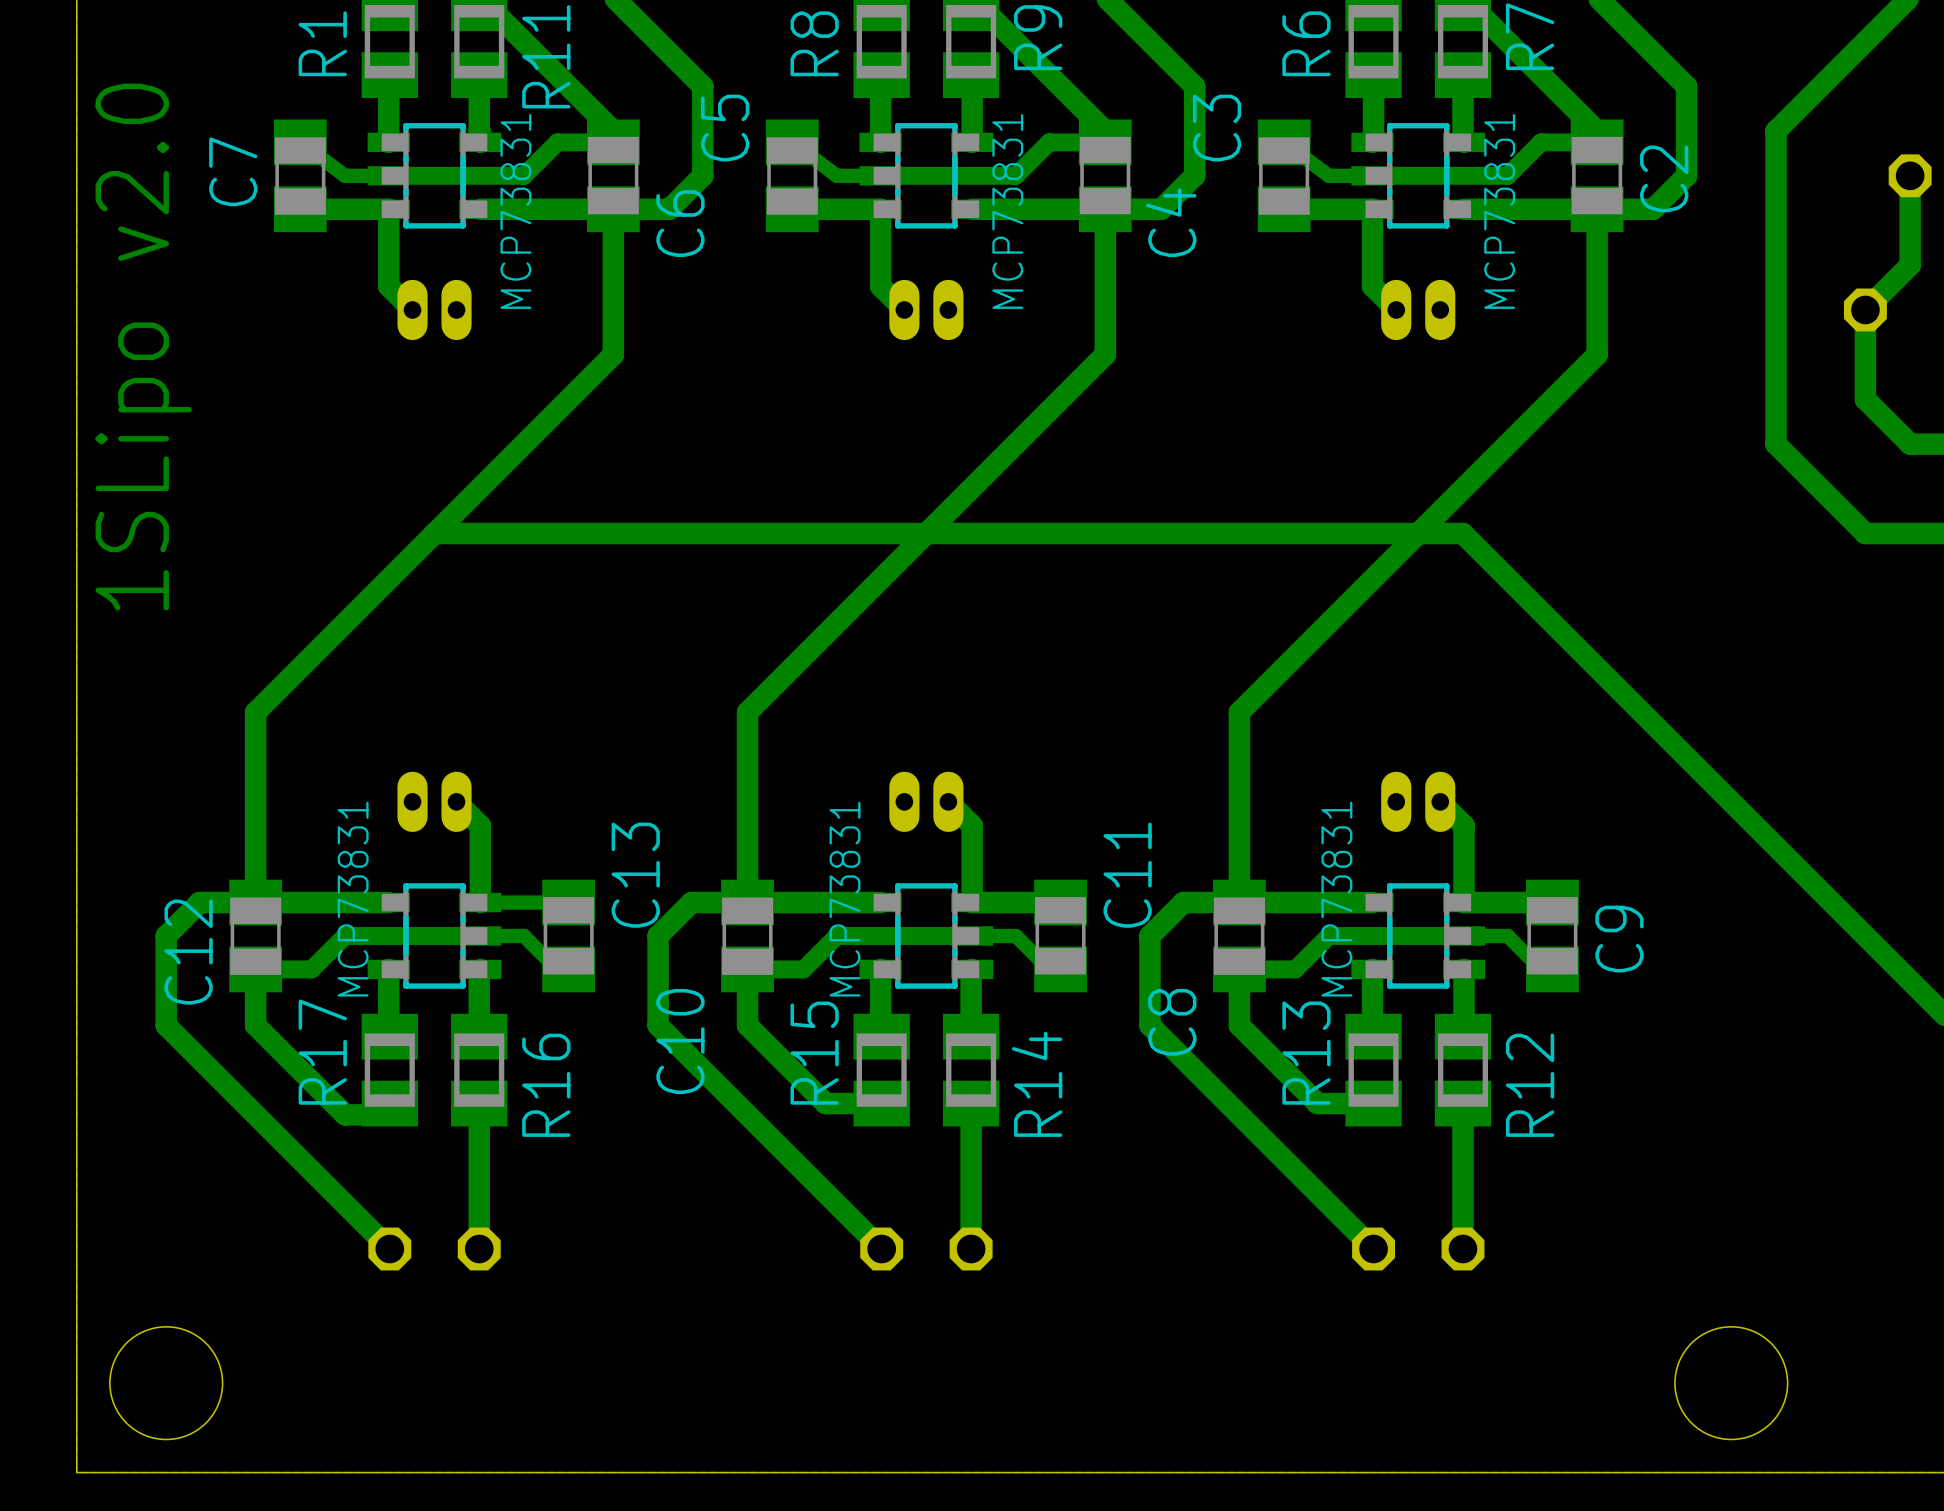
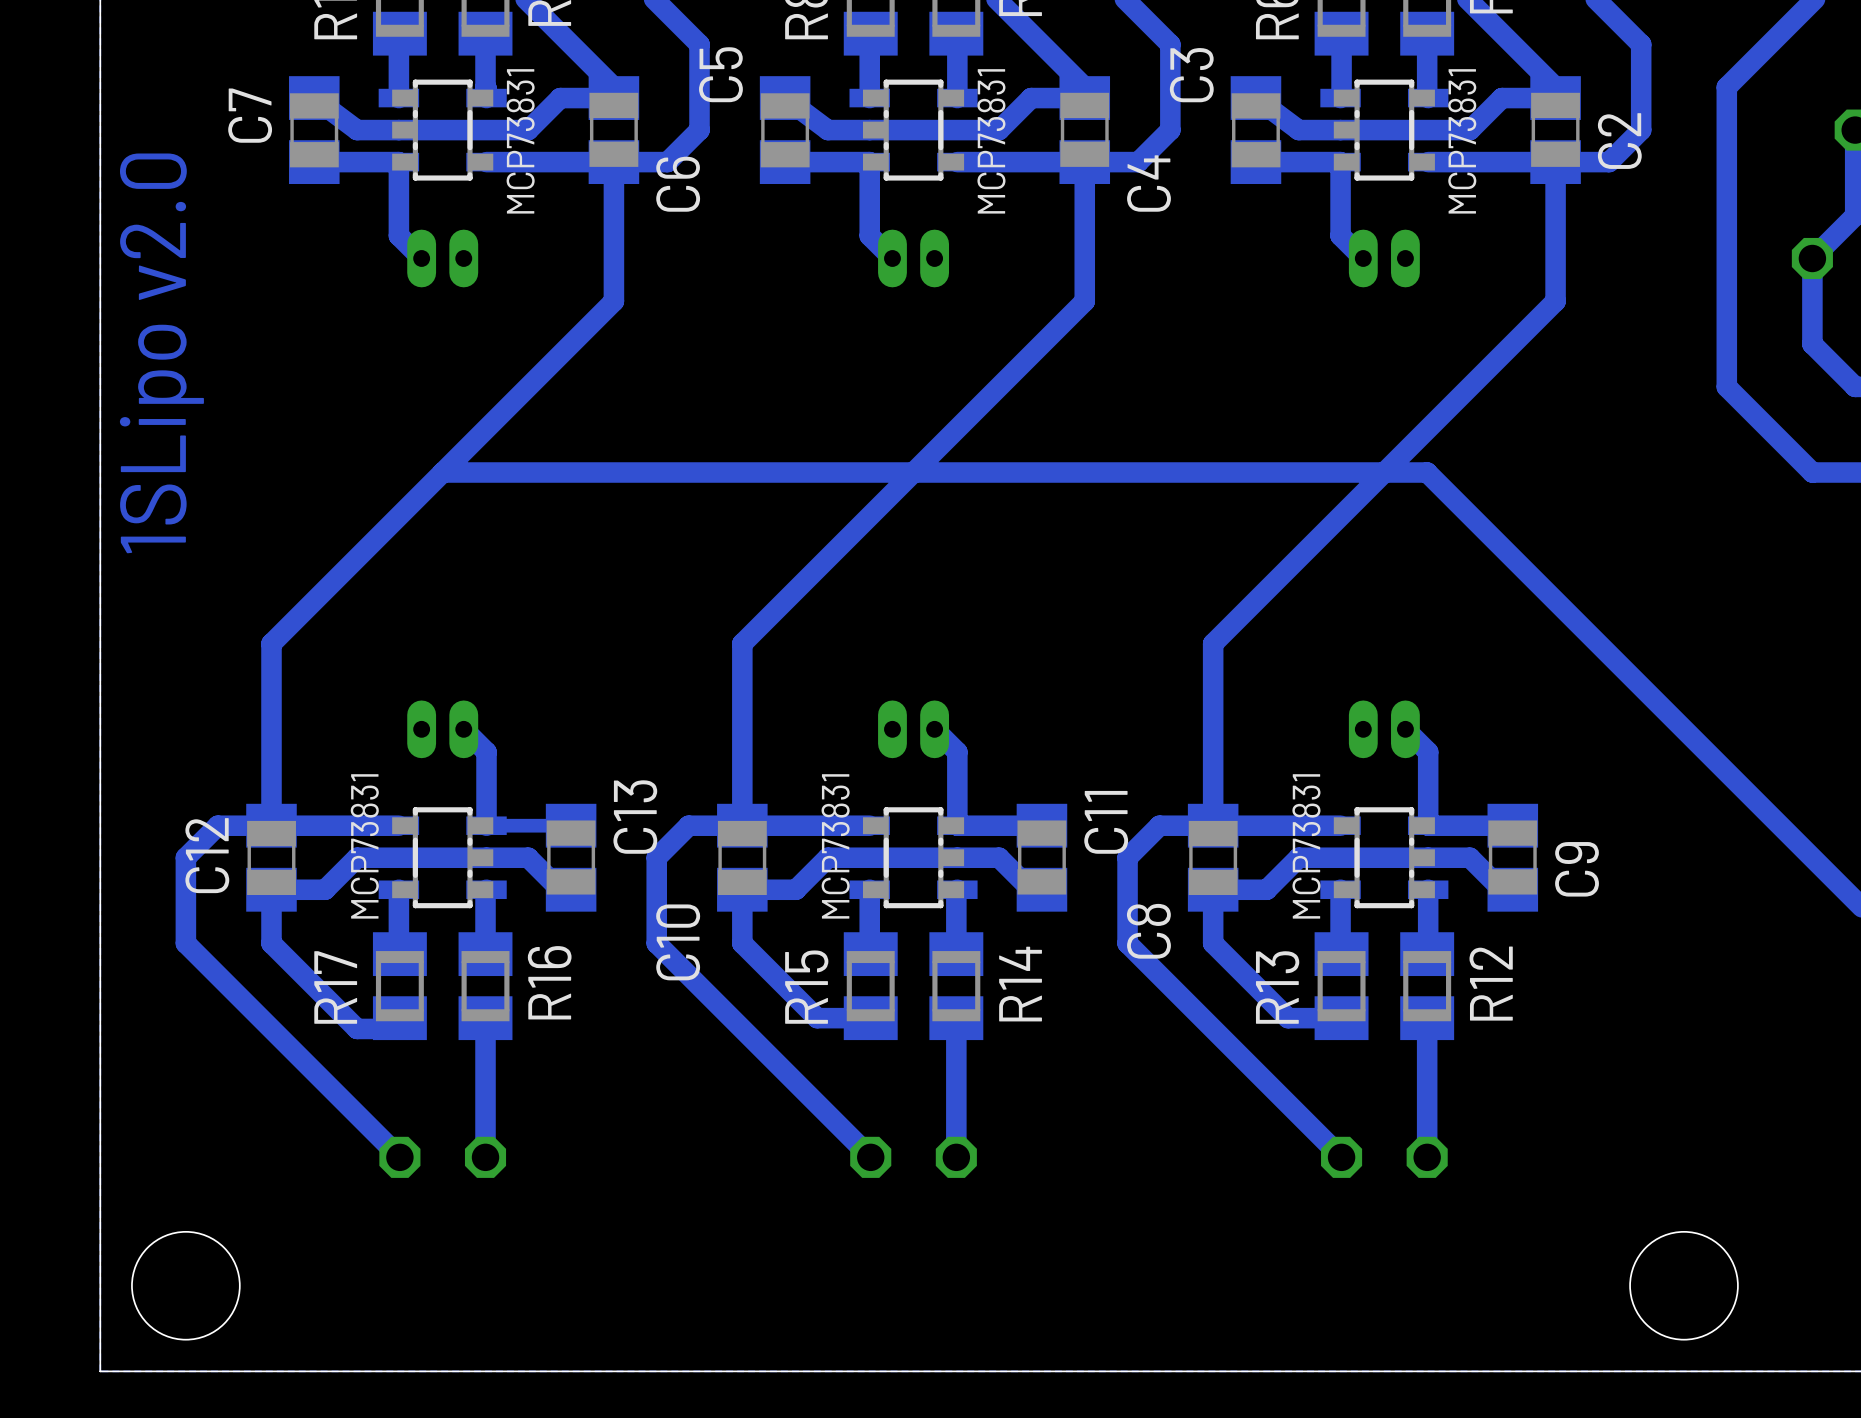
track width: thin (613, 142) (557, 142) (523, 175) (345, 175) (300, 142) -> thick (613, 98) (560, 98) (528, 130) (357, 130) (314, 98)
track width: thin (1105, 142) (1049, 142) (1015, 175) (836, 175) (792, 142) -> thick (1084, 98) (1031, 98) (999, 130) (827, 130) (785, 98)
track width: thin (1597, 142) (1541, 142) (1507, 175) (1328, 175) (1284, 142) -> thick (1555, 98) (1501, 98) (1469, 130) (1298, 130) (1255, 98)
track width: thin (557, 969) (523, 935) (345, 935) (311, 969) (255, 969) -> thick (560, 889) (528, 857) (357, 857) (325, 889) (271, 889)
track width: thin (1049, 969) (1015, 935) (836, 935) (803, 969) (747, 969) -> thick (1031, 889) (999, 857) (827, 857) (795, 889) (742, 889)
track width: thin (1541, 969) (1507, 935) (1328, 935) (1295, 969) (1239, 969) -> thick (1501, 889) (1469, 857) (1298, 857) (1266, 889) (1213, 889)

